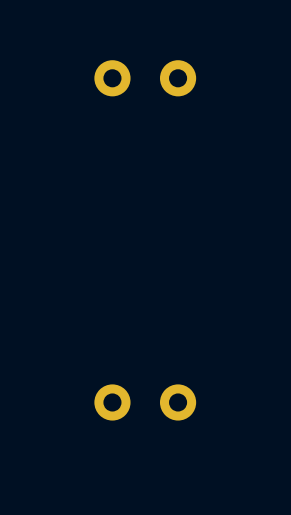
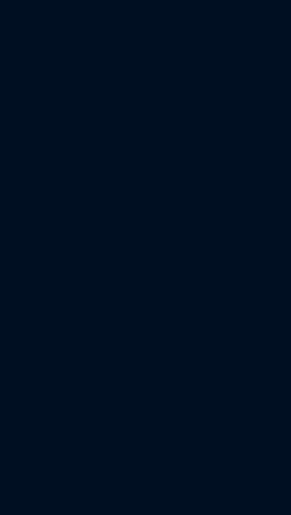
part: (145, 78) -> none
part: (145, 402) -> none

